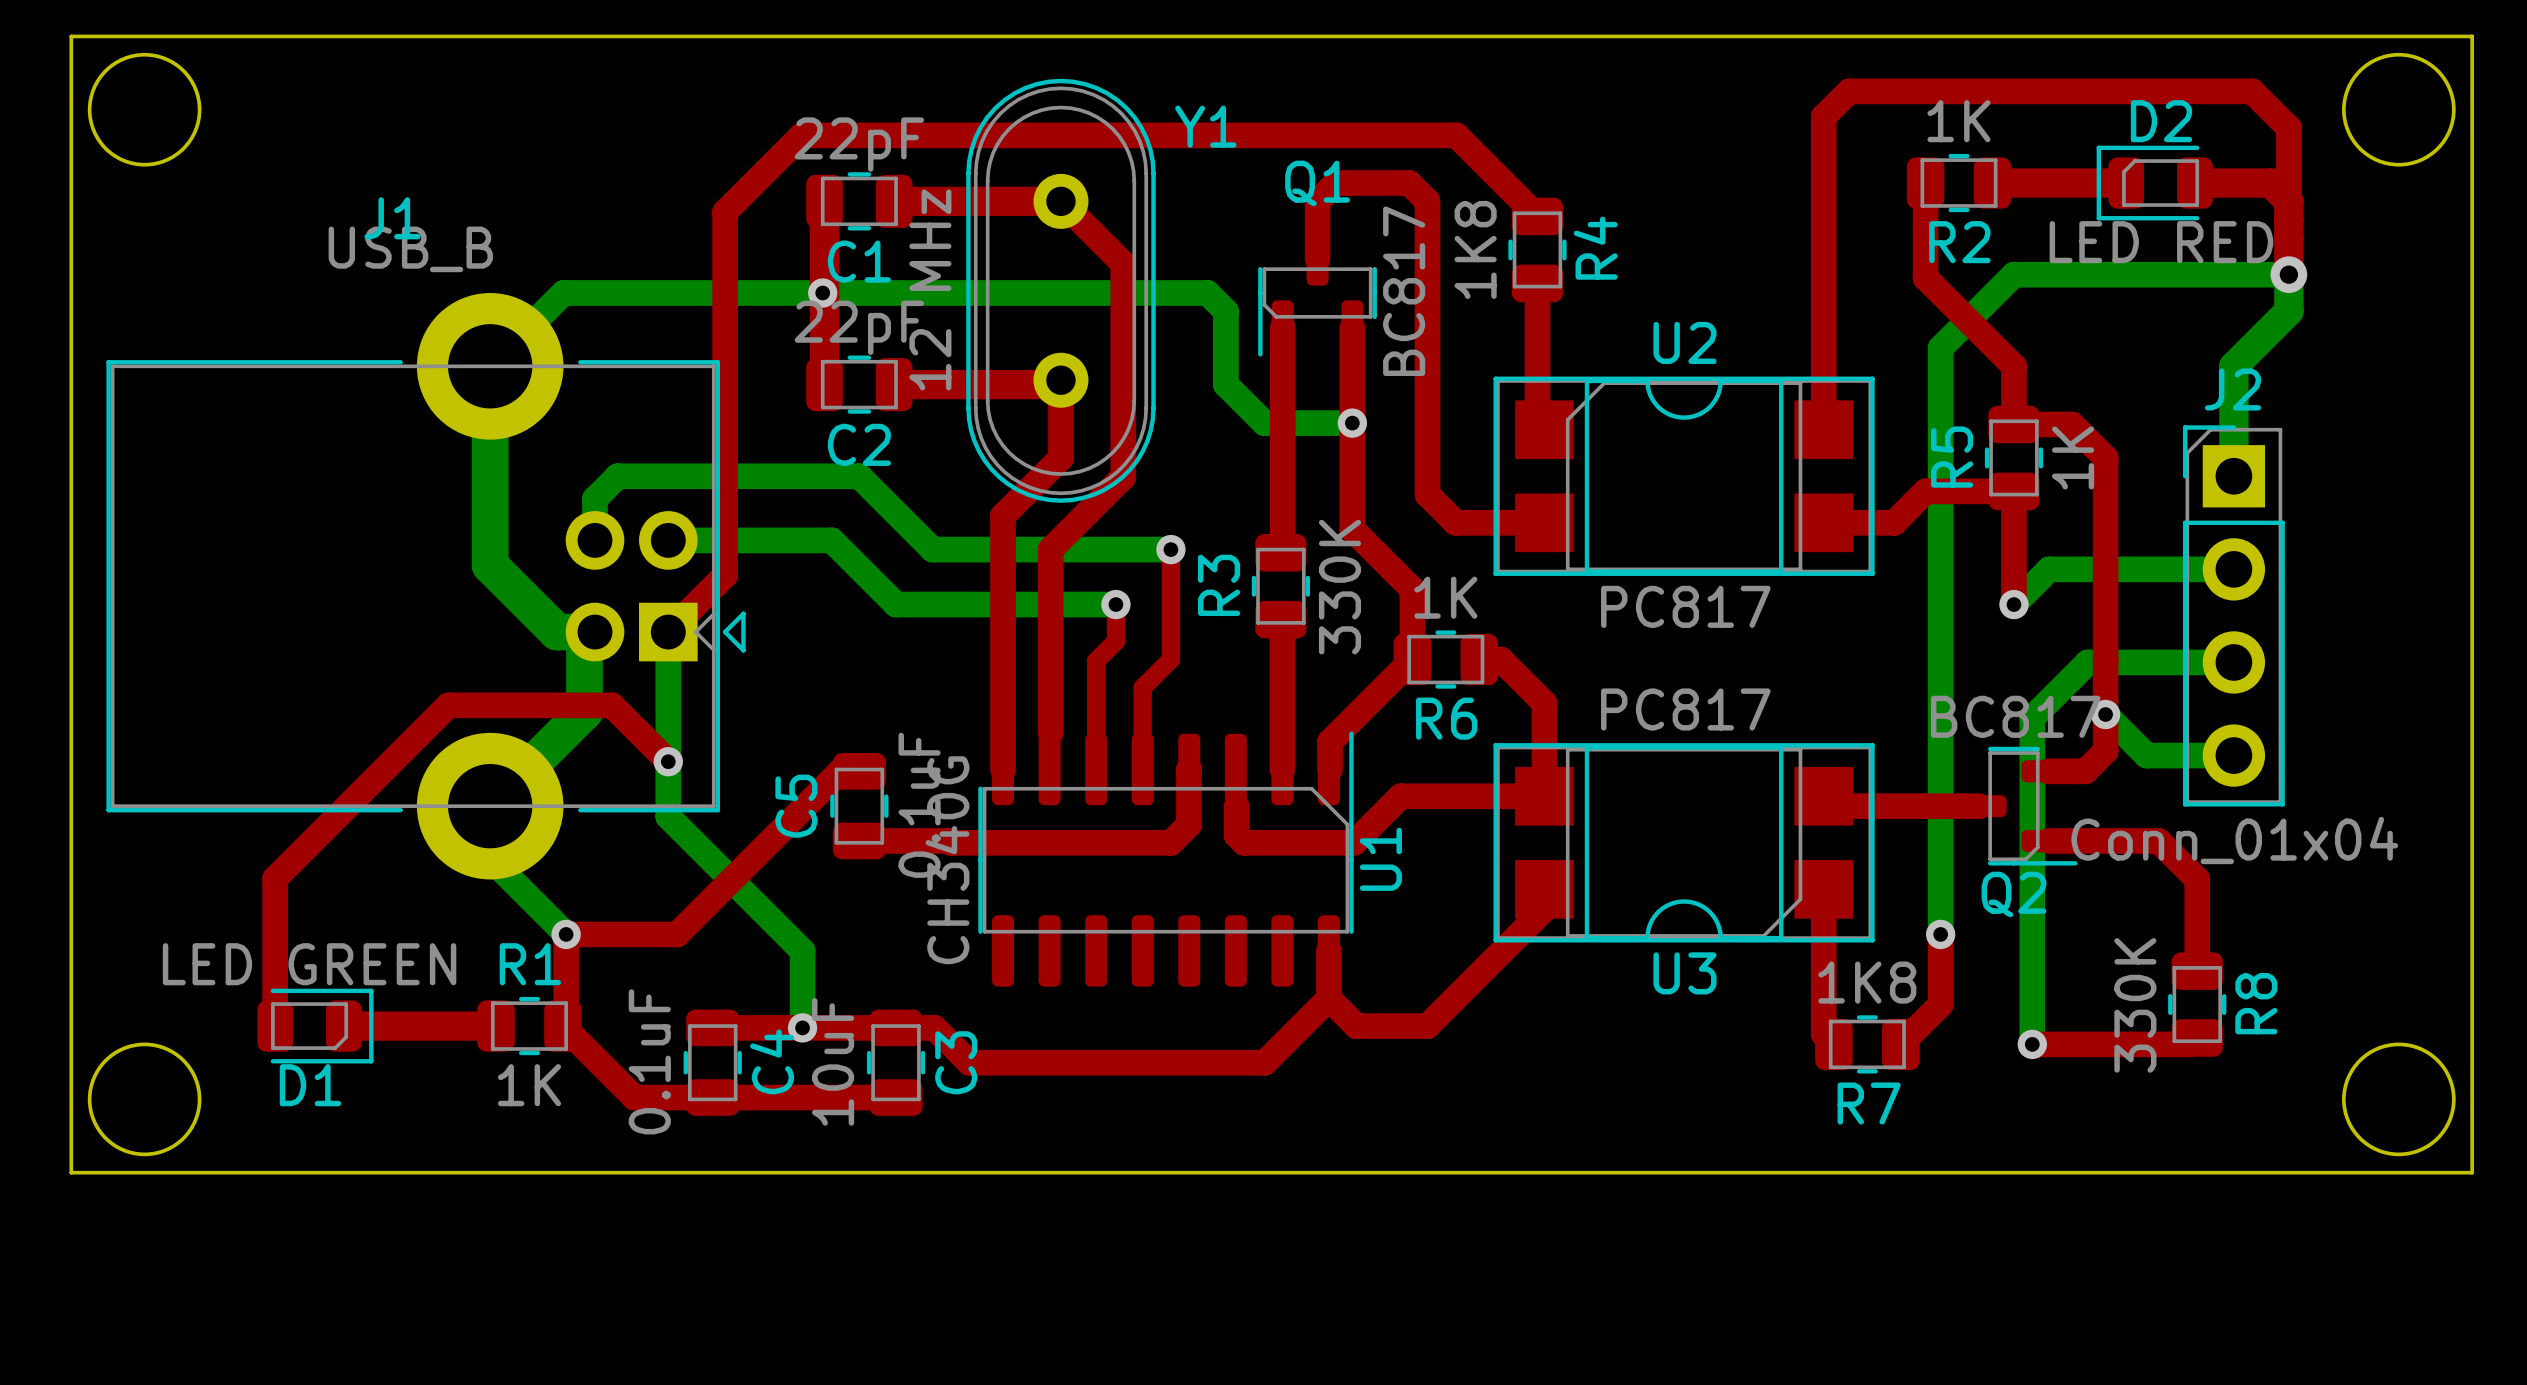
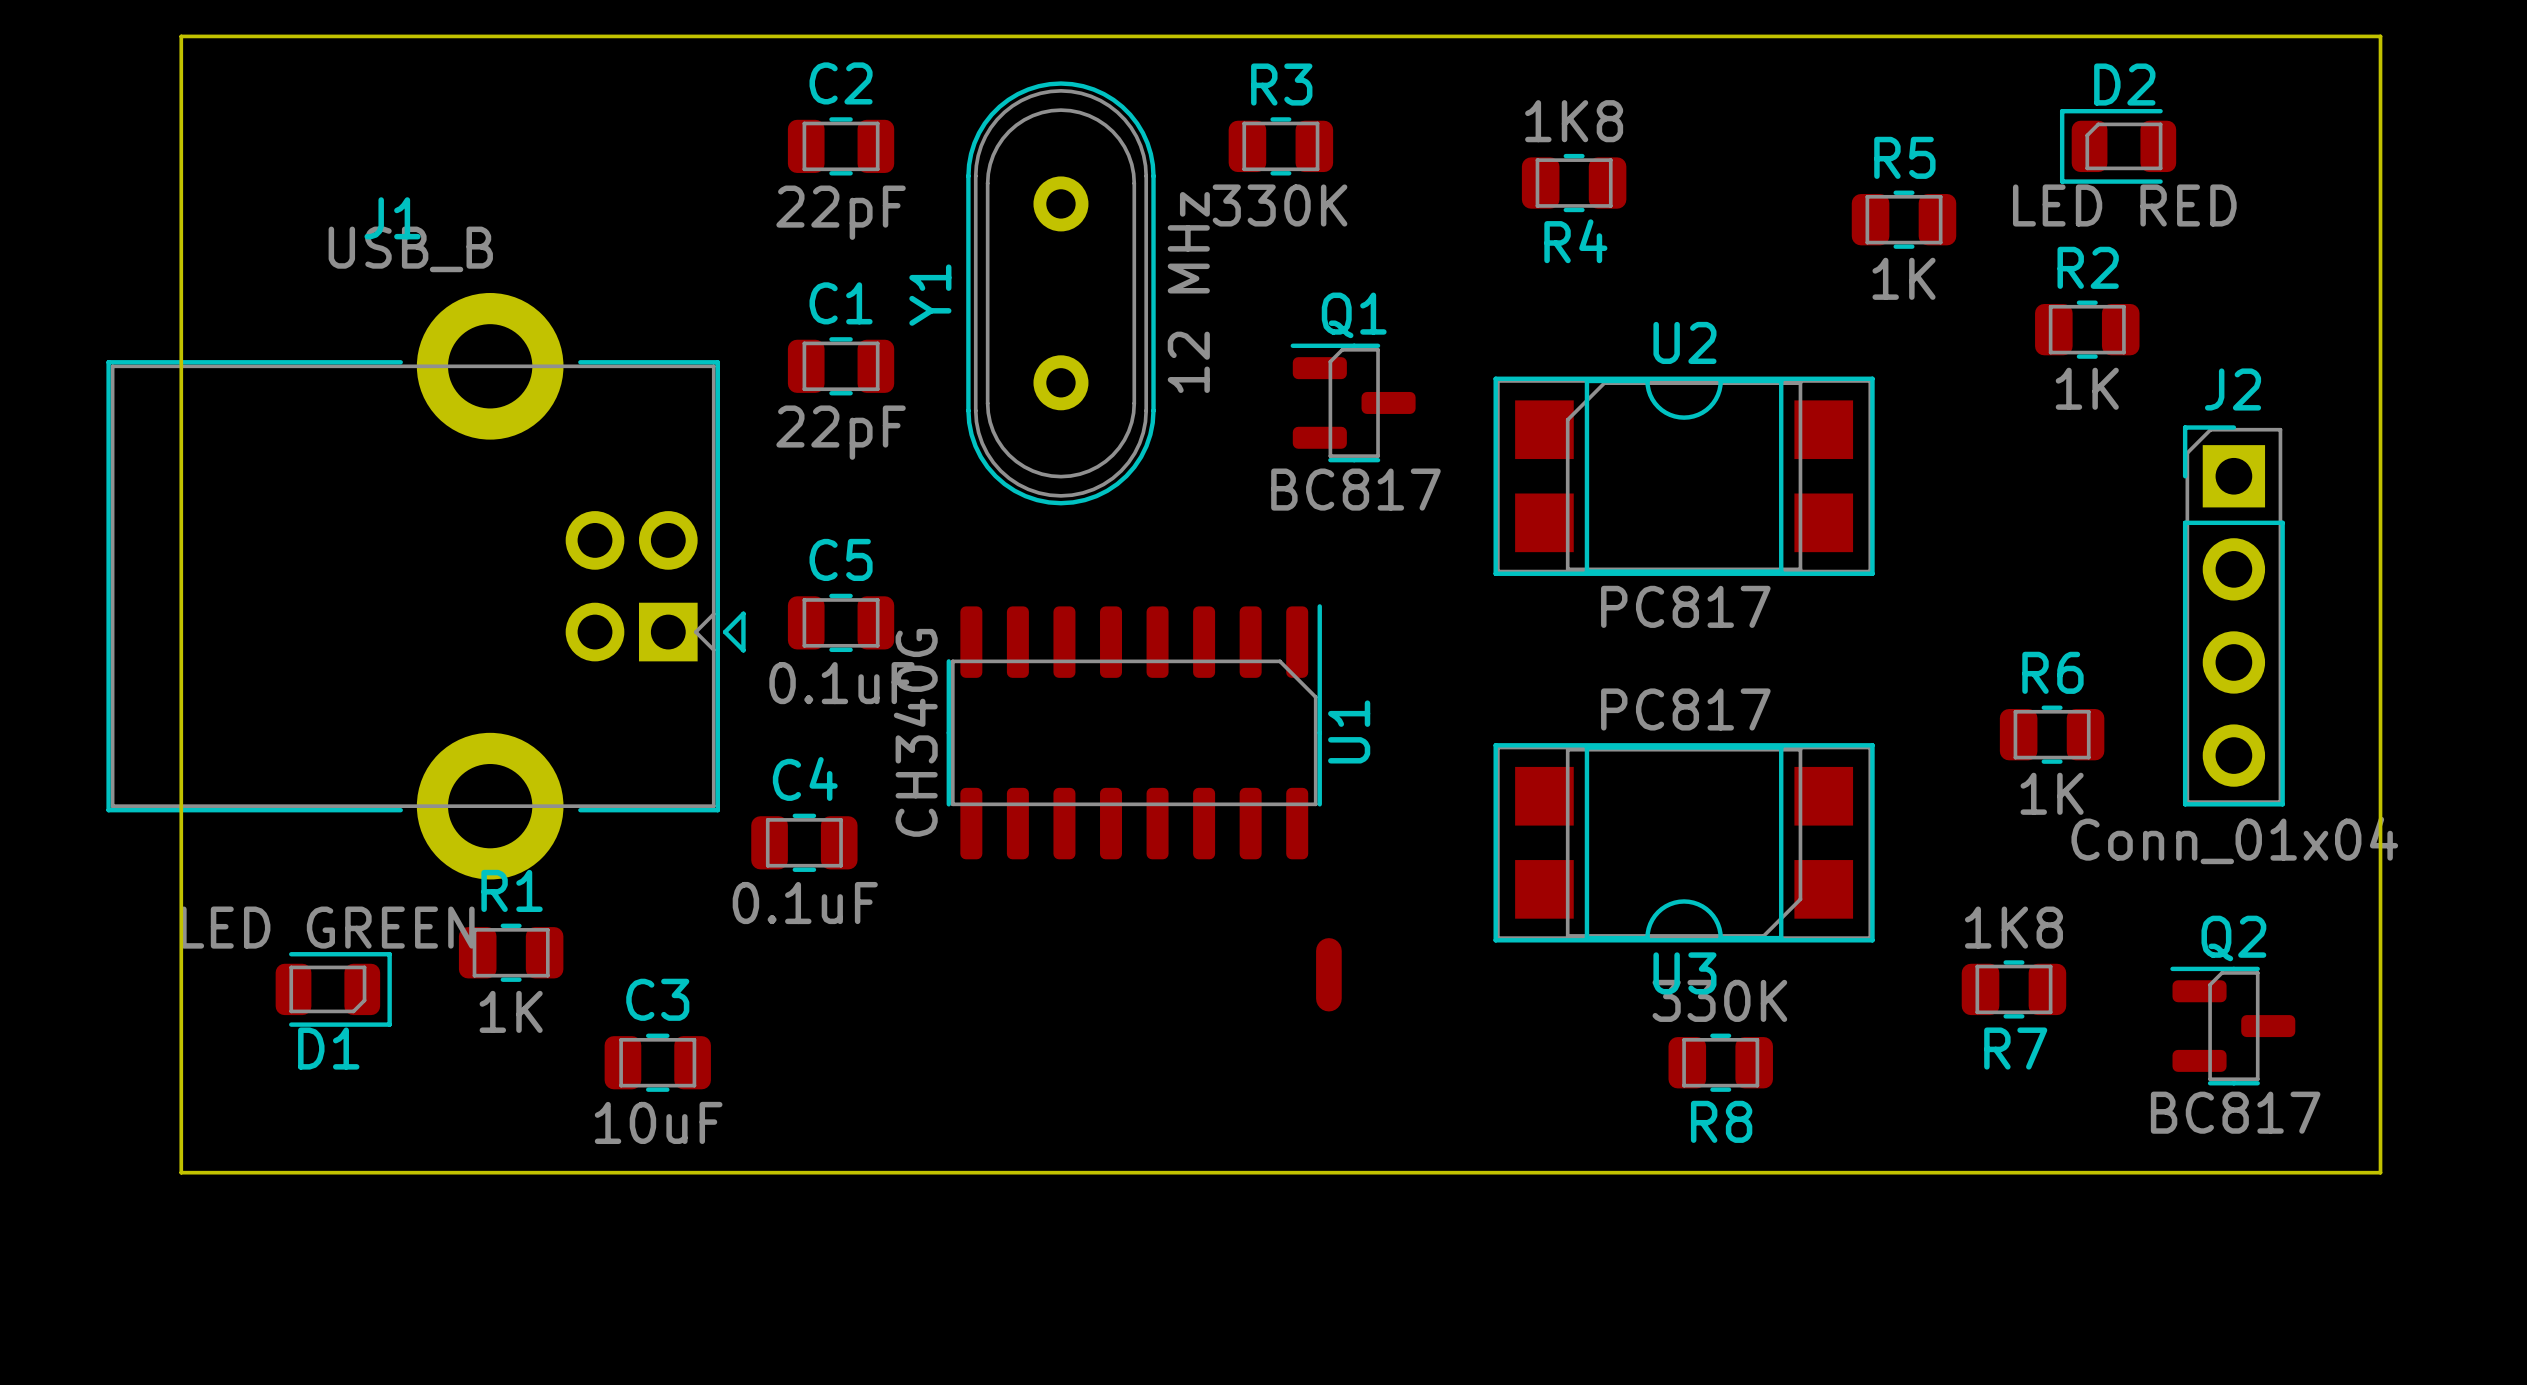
board edge: (181, 36) (71, 36) (71, 1172) (181, 1172) -> (181, 36) (181, 1172)
board edge: (2380, 36) (2472, 36) (2472, 1172) (2380, 1172) -> (2380, 36) (2380, 1172)
round board edge: [87, 52, 202, 167] -> none
round board edge: [2342, 52, 2456, 167] -> none
R2 value position: 1K (1958, 121) -> 1K (2087, 388)
Y1 name position: Y1 (1205, 126) -> Y1 (930, 295)
C1 value position: 22pF (859, 144) -> 22pF (841, 432)
top track: (1925, 183) (1925, 277) (2013, 366) (2013, 424) (2072, 424) (2105, 457) (2105, 751) (2085, 771) (2048, 771) -> none
R2 position: (1958, 183) -> (2087, 329)
top track: (1992, 183) (2126, 183) -> none
D2 position: (2154, 183) -> (2118, 146)
top track: (2194, 183) (2270, 183) (2288, 201) -> none
top track: (824, 201) (824, 384) -> none
C1 position: (859, 201) -> (841, 366)
top track: (894, 201) (1060, 201) (1123, 263) (1123, 477) (1050, 549) (1050, 732) -> none
top track: (2288, 201) (2288, 128) (2252, 91) (1849, 91) (1823, 116) (1823, 429) -> none
top track: (2288, 201) (2288, 274) -> none
top track: (1537, 216) (1456, 135) (801, 135) (725, 212) (725, 575) (668, 632) -> none
R2 name position: R2 (1959, 242) -> R2 (2088, 267)
R4 rotation: 0° (1537, 249) -> 90° clockwise (1574, 183)
R4 position: (1537, 249) -> (1574, 183)
top track: (1317, 258) (1317, 201) (1335, 183) (1409, 183) (1427, 201) (1427, 494) (1455, 522) (1544, 522) -> none
C1 name position: C1 (859, 261) -> C1 (841, 303)
via: (2288, 274) -> none
top track: (1537, 283) (1537, 422) (1544, 429) (1540, 425) -> none
Y1 rotation: 0° (1060, 290) -> 180° (1060, 293)
via: (822, 293) -> none
Q1 rotation: 0° (1317, 294) -> 90° clockwise (1353, 402)
Q1 position: (1317, 294) -> (1353, 402)
C2 value position: 22pF (859, 327) -> 22pF (841, 212)
top track: (1282, 327) (1282, 550) (1280, 552) -> none
top track: (1352, 327) (1352, 529) (1412, 589) (1412, 659) (1329, 741) (1329, 769) -> none
C2 position: (859, 384) -> (841, 146)
top track: (894, 384) (1056, 384) (1060, 380) (1060, 457) (1003, 515) (1003, 769) -> none
bottom track: (1352, 423) (1264, 423) (1225, 384) (1225, 311) (1207, 293) (563, 293) (490, 366) (490, 565) (556, 632) (595, 632) (584, 642) (584, 711) (490, 806) (490, 858) (566, 934) -> none
via: (1352, 423) -> none
C2 name position: C2 (859, 444) -> C2 (841, 83)
R5 rotation: 0° (2013, 457) -> 90° clockwise (1904, 219)
R5 position: (2013, 457) -> (1904, 219)
bottom track: (2233, 476) (2233, 366) (2288, 311) (2288, 274) (2013, 274) (1940, 347) (1940, 934) -> none
top track: (1823, 522) (1894, 522) (1925, 491) (2013, 491) (2013, 604) -> none
bottom track: (595, 540) (595, 498) (617, 476) (859, 476) (932, 549) (1170, 549) -> none
bottom track: (668, 540) (831, 540) (896, 604) (1115, 604) -> none
top track: (1170, 549) (1170, 659) (1142, 687) (1142, 769) -> none
via: (1170, 549) -> none
bottom track: (2233, 569) (2049, 569) (2013, 604) -> none
R3 rotation: 0° (1280, 586) -> 90° clockwise (1280, 146)
R3 position: (1280, 586) -> (1280, 146)
R6 value position: 1K (1445, 597) -> 1K (2052, 793)
top track: (1115, 604) (1115, 641) (1096, 661) (1096, 769) -> none
via: (1115, 604) -> none
via: (2013, 604) -> none
top track: (1280, 619) (1282, 769) -> none
bottom track: (668, 632) (668, 816) (802, 950) (802, 1027) -> none
R6 position: (1445, 659) -> (2052, 734)
top track: (1479, 659) (1500, 659) (1544, 703) (1544, 796) (1400, 796) (1354, 842) (1244, 842) (1236, 835) (1236, 806) -> none
bottom track: (2233, 662) (2087, 662) (2032, 717) (2032, 1044) -> none
bottom track: (2105, 714) (2146, 755) (2233, 755) -> none
via: (2105, 714) -> none
R6 name position: R6 (1446, 718) -> R6 (2052, 672)
top track: (668, 761) (611, 705) (448, 705) (275, 878) (275, 1026) -> none
via: (668, 761) -> none
top track: (1188, 769) (1188, 824) (1170, 842) (859, 840) -> none
top track: (859, 771) (840, 771) (677, 934) (566, 934) (566, 1022) (562, 1026) (634, 1097) (896, 1097) -> none
top track: (1823, 796) (1833, 806) (1979, 806) -> none
C5 rotation: 0° (859, 806) -> 90° clockwise (841, 622)
C5 position: (859, 806) -> (841, 622)
Q2 rotation: 0° (2015, 806) -> 180° (2232, 1026)
Q2 position: (2015, 806) -> (2232, 1026)
top track: (2048, 840) (2158, 840) (2197, 879) (2197, 971) -> none
U1 position: (1165, 859) -> (1134, 731)
top track: (1544, 889) (1544, 909) (1427, 1026) (1356, 1026) (1328, 998) (1264, 1062) (969, 1062) (934, 1027) (712, 1027) -> none
top track: (1823, 889) (1823, 1034) (1833, 1044) -> none
via: (566, 934) -> none
top track: (1940, 934) (1940, 1004) (1900, 1044) -> none
via: (1940, 934) -> none
R8 rotation: 0° (2197, 1004) -> 90° clockwise (1720, 1062)
R8 position: (2197, 1004) -> (1720, 1062)
D1 position: (315, 1026) -> (333, 989)
top track: (343, 1026) (496, 1026) -> none
R1 position: (529, 1026) -> (511, 952)
via: (802, 1027) -> none
top track: (2197, 1037) (2190, 1044) (2032, 1044) -> none
round board edge: [87, 1042, 202, 1157] -> none
round board edge: [2342, 1042, 2456, 1157] -> none
R7 position: (1867, 1044) -> (2013, 989)
via: (2032, 1044) -> none
C4 value position: 0.1uF (649, 1061) -> 0.1uF (805, 903)
C4 name position: C4 (772, 1061) -> C4 (805, 778)
C3 value position: 10uF (833, 1061) -> 10uF (658, 1122)
C4 rotation: 0° (712, 1062) -> 90° clockwise (804, 842)
C4 position: (712, 1062) -> (804, 842)
C3 rotation: 0° (896, 1062) -> 90° clockwise (657, 1062)
C3 position: (896, 1062) -> (657, 1062)
C3 name position: C3 (956, 1062) -> C3 (657, 999)

